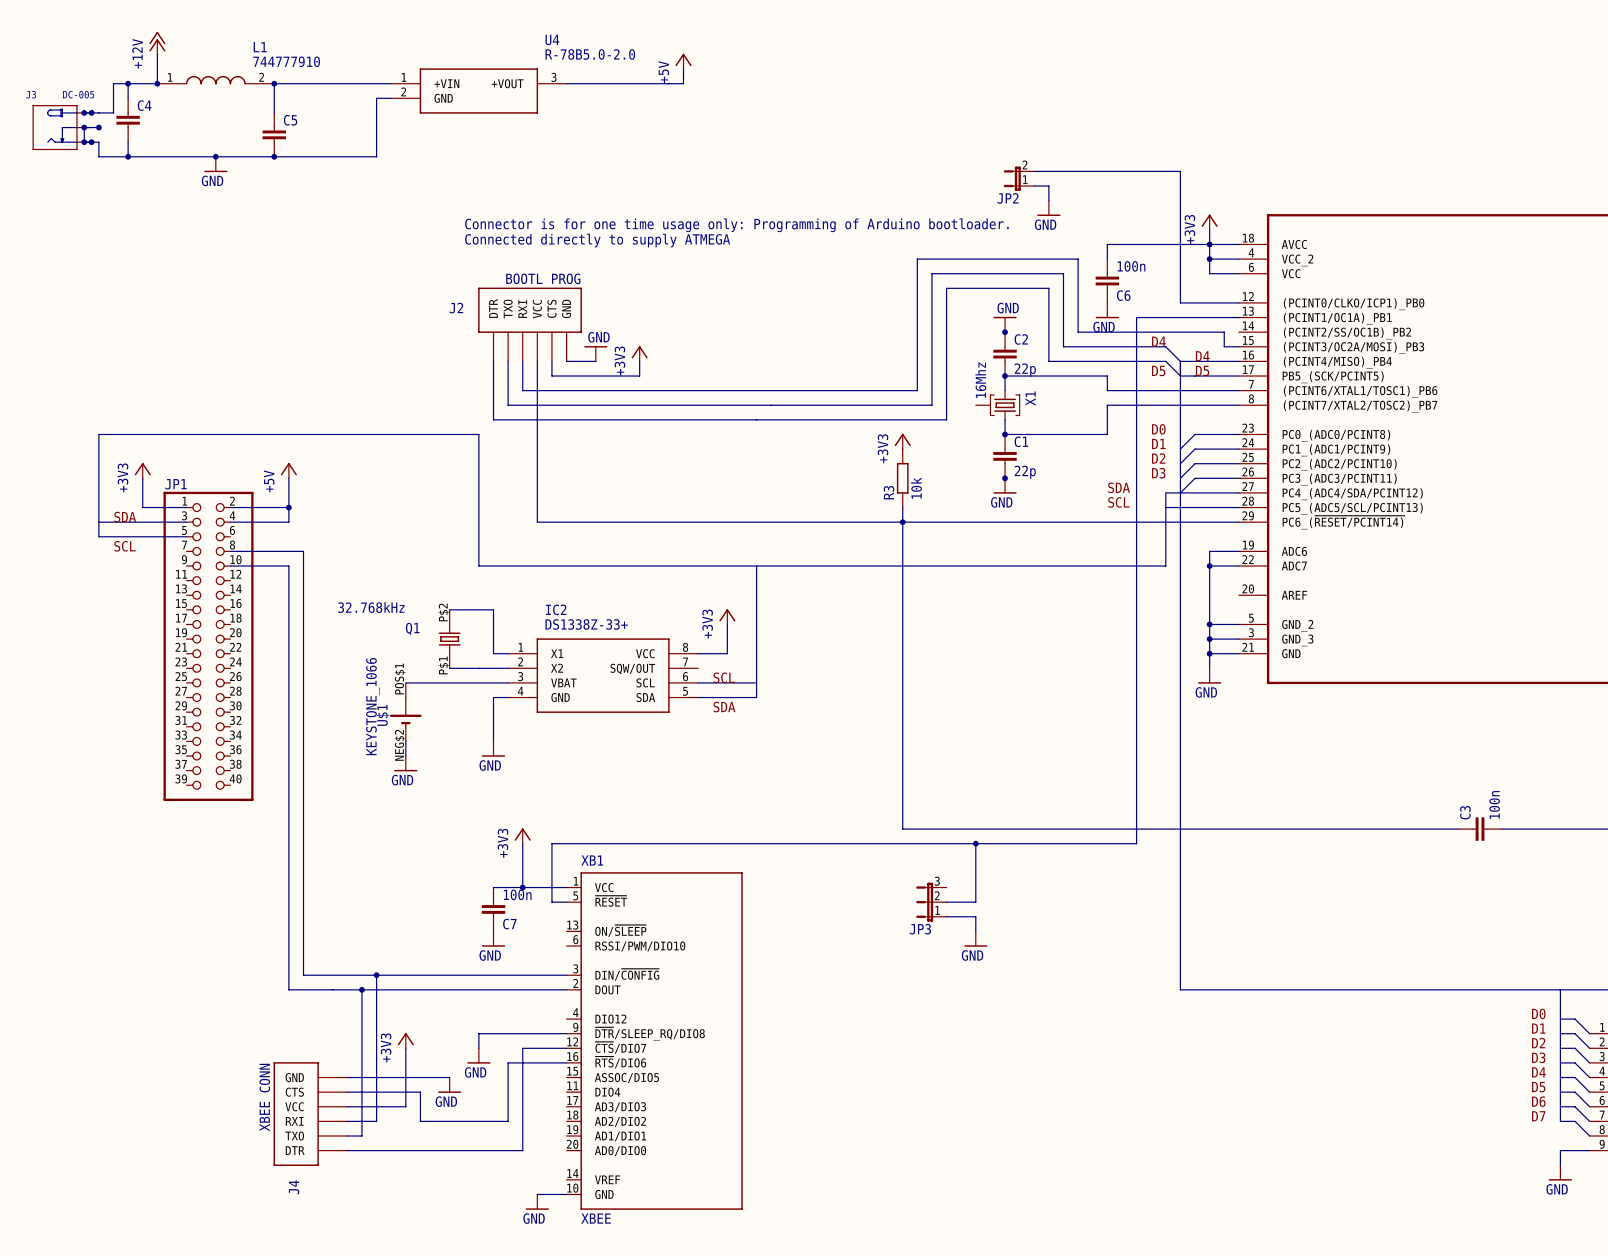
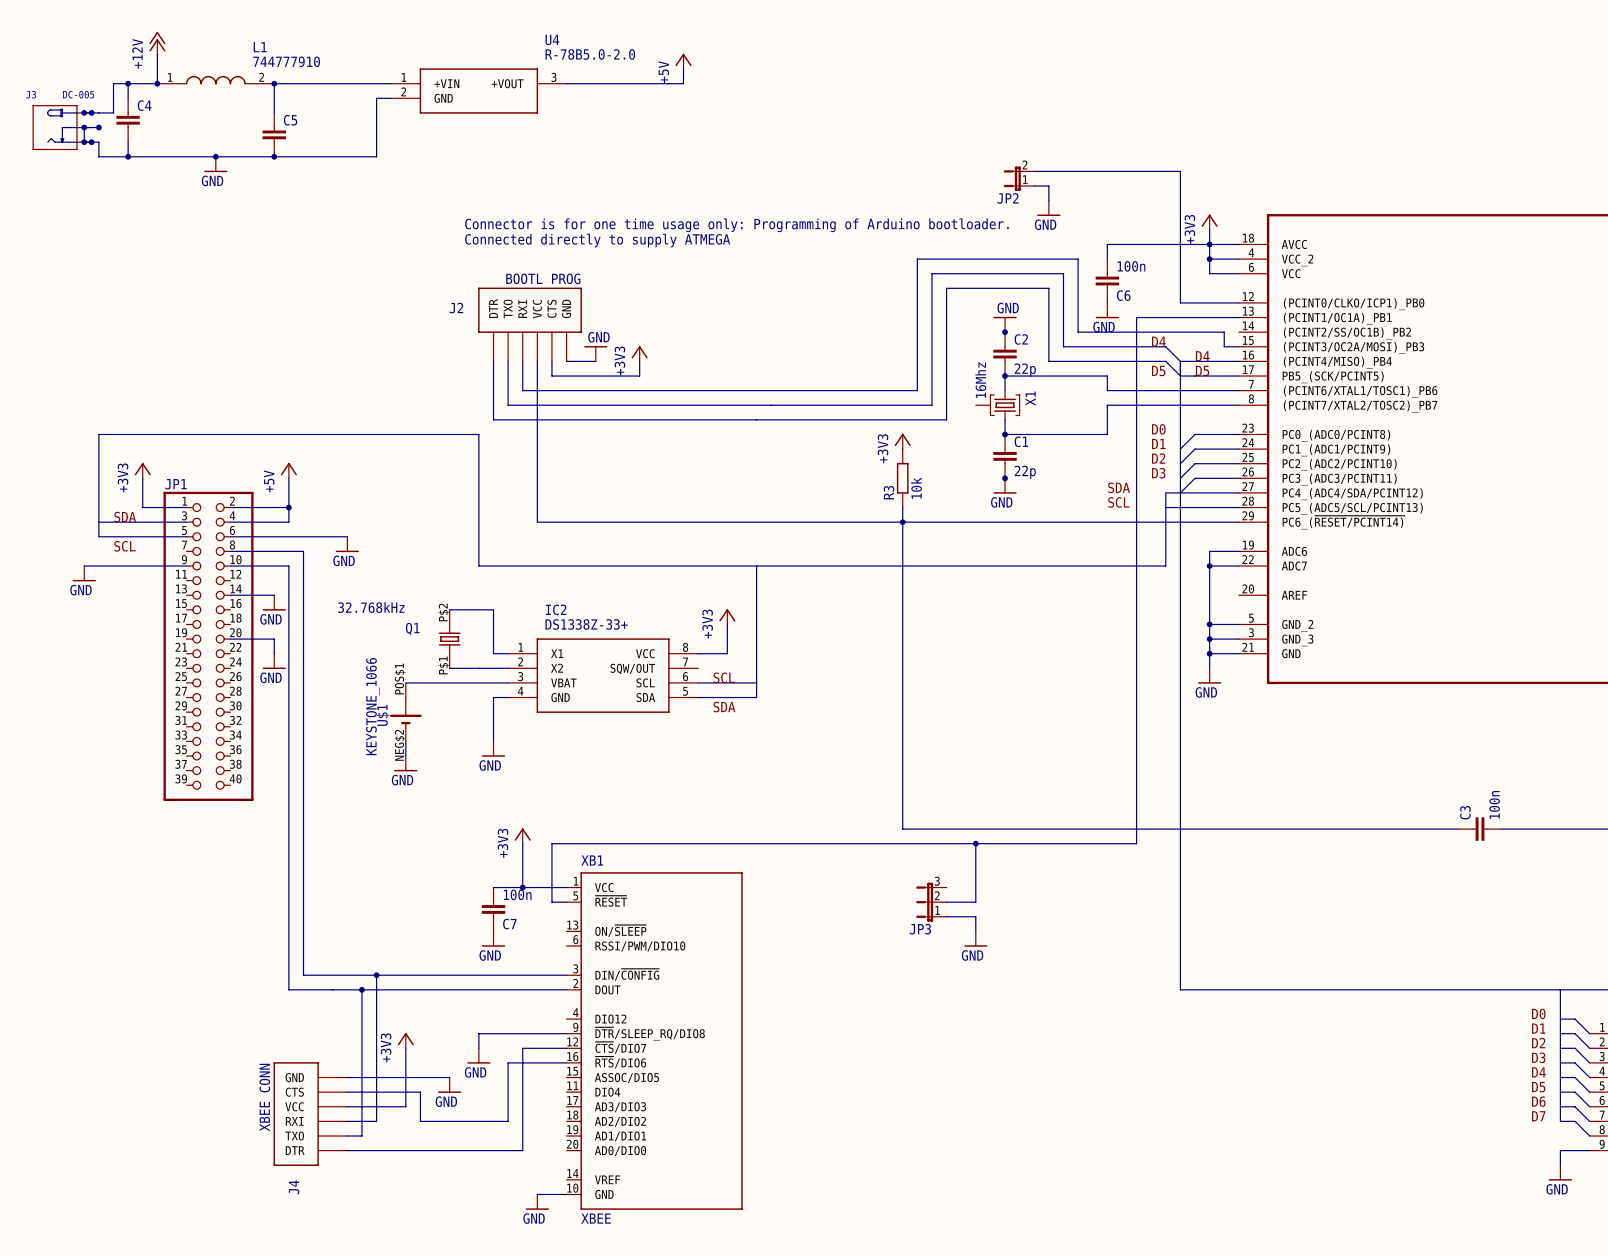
wire: none -> (230, 536) (347, 536)
power symbol: none -> GND (347, 544)
wire: none -> (84, 566) (186, 566)
power symbol: none -> GND (84, 573)
wire: none -> (230, 595) (274, 595)
power symbol: none -> GND (274, 602)
wire: none -> (230, 639) (274, 639) (274, 653)
power symbol: none -> GND (274, 661)

